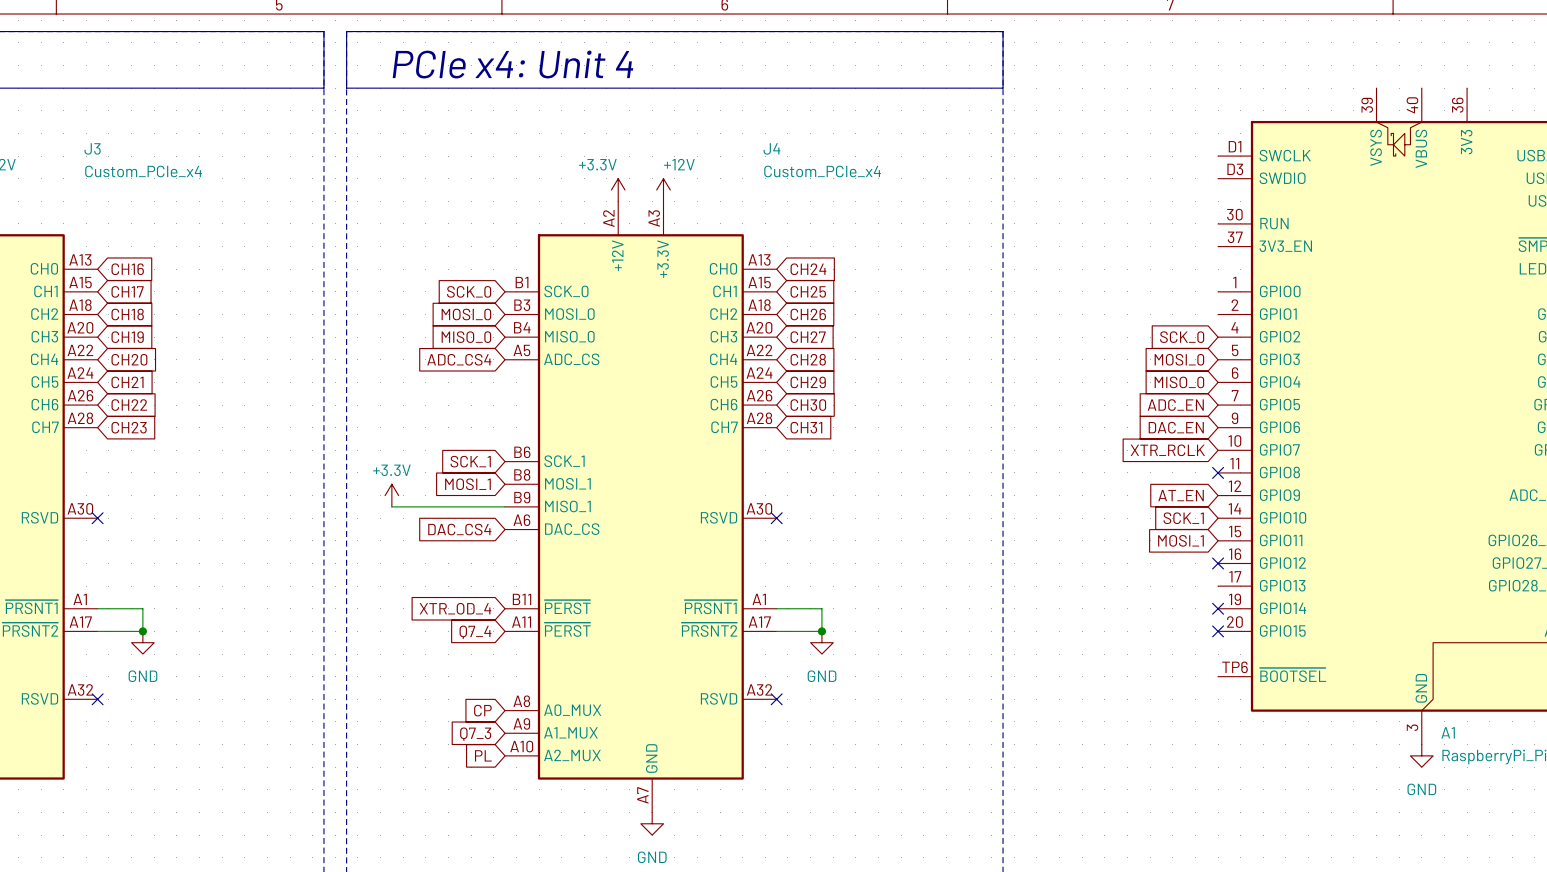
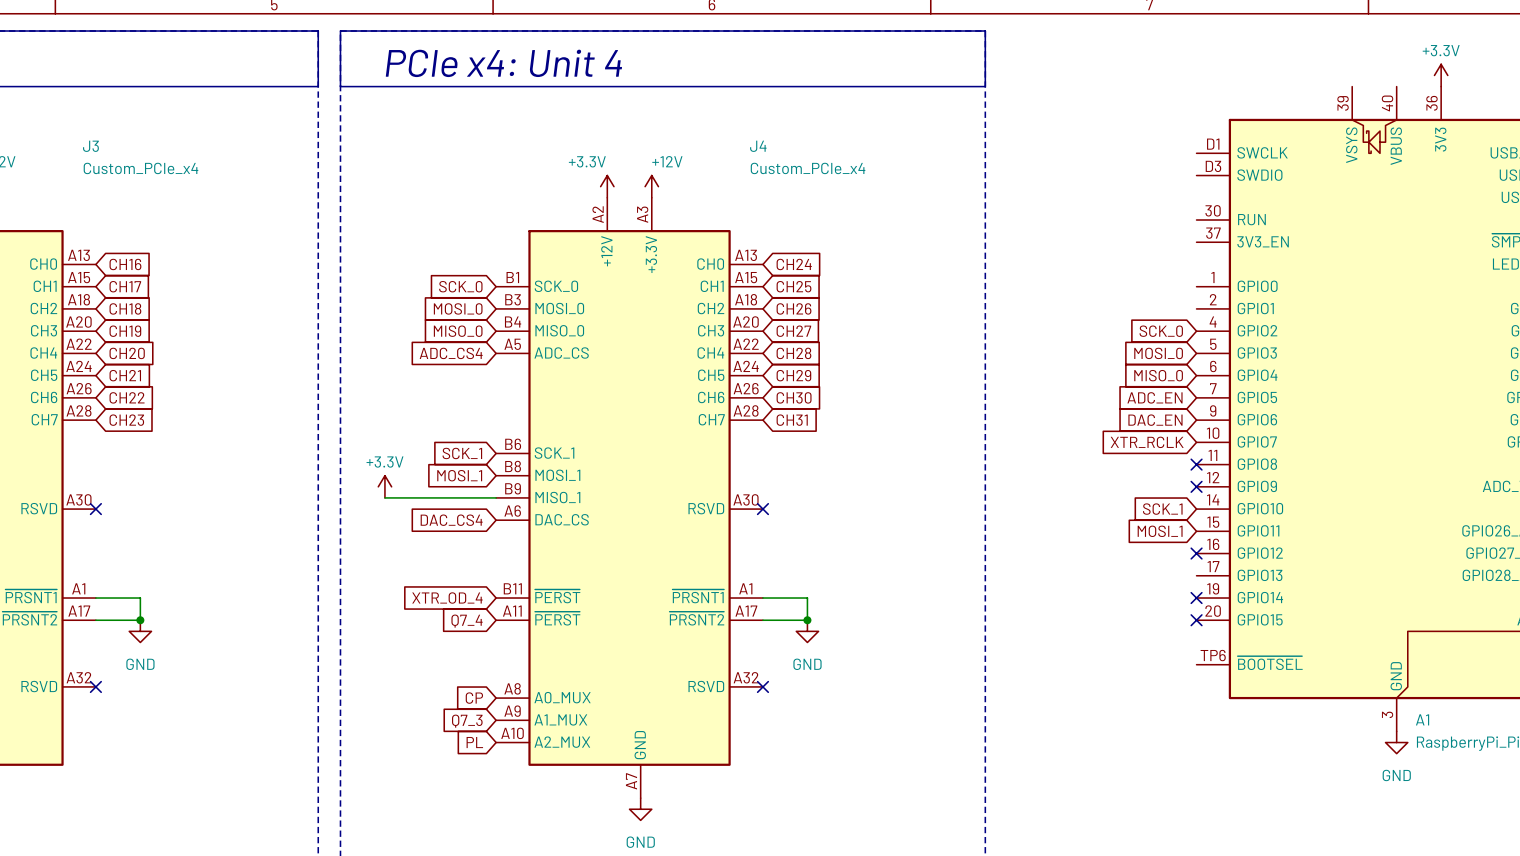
power symbol: none -> +3.3V (1441, 75)
global label: AT_EN (1181, 495) -> none
no-connect mark: none -> (1196, 486)

